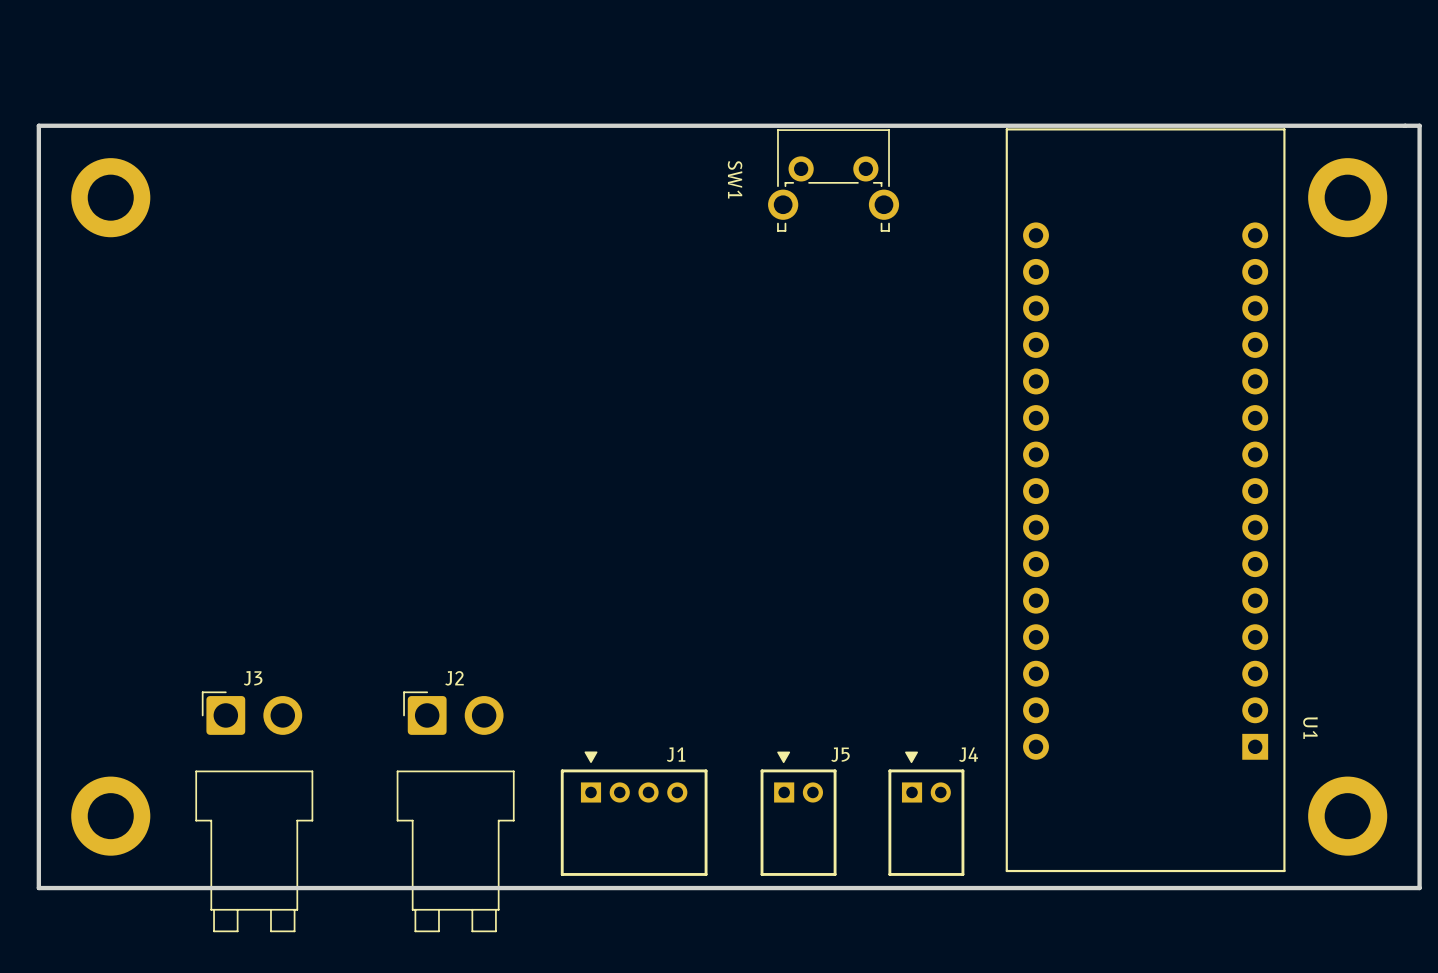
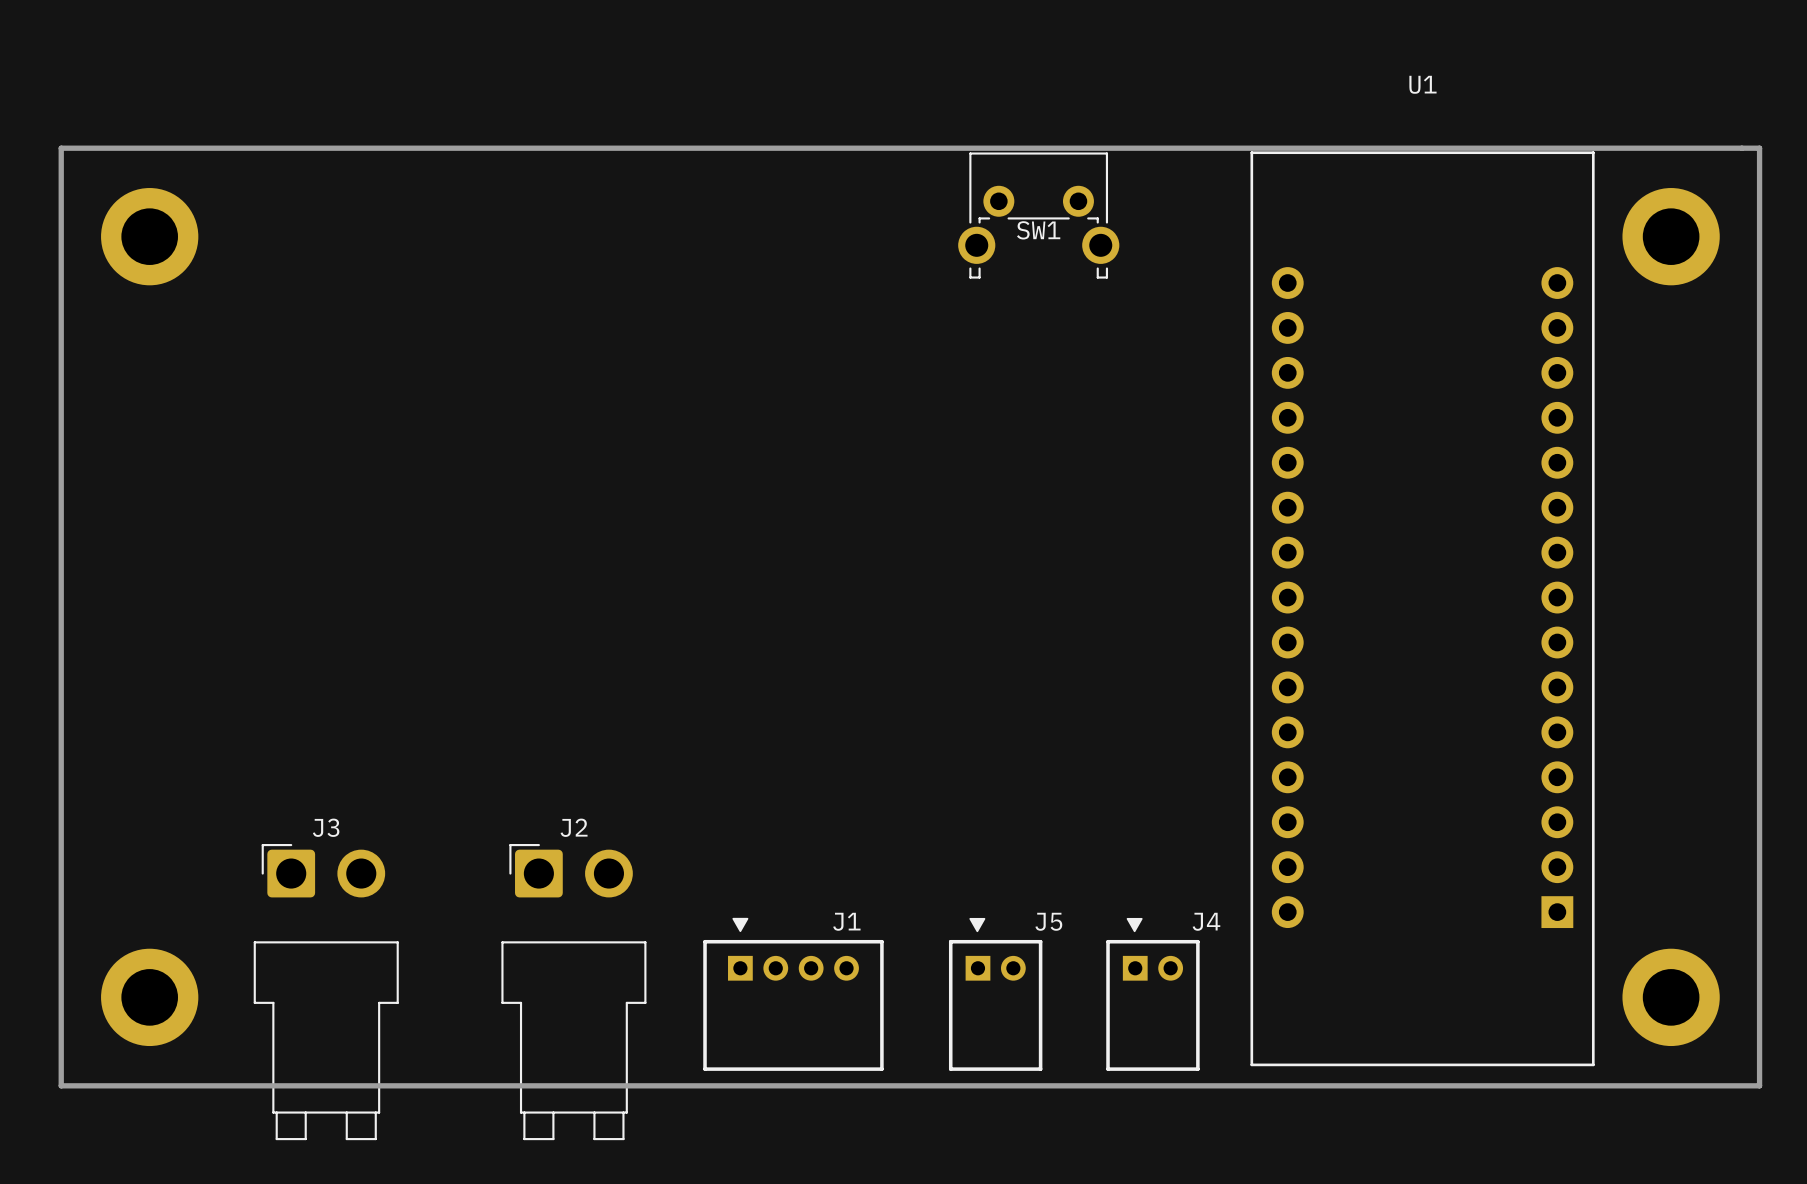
SW1 name rotation: 0° (735, 179) -> 90° counterclockwise (1038, 230)
SW1 name position: SW1 (735, 179) -> SW1 (1038, 230)
U1 name rotation: 0° (1310, 728) -> 90° counterclockwise (1422, 84)
U1 name position: U1 (1310, 728) -> U1 (1422, 84)

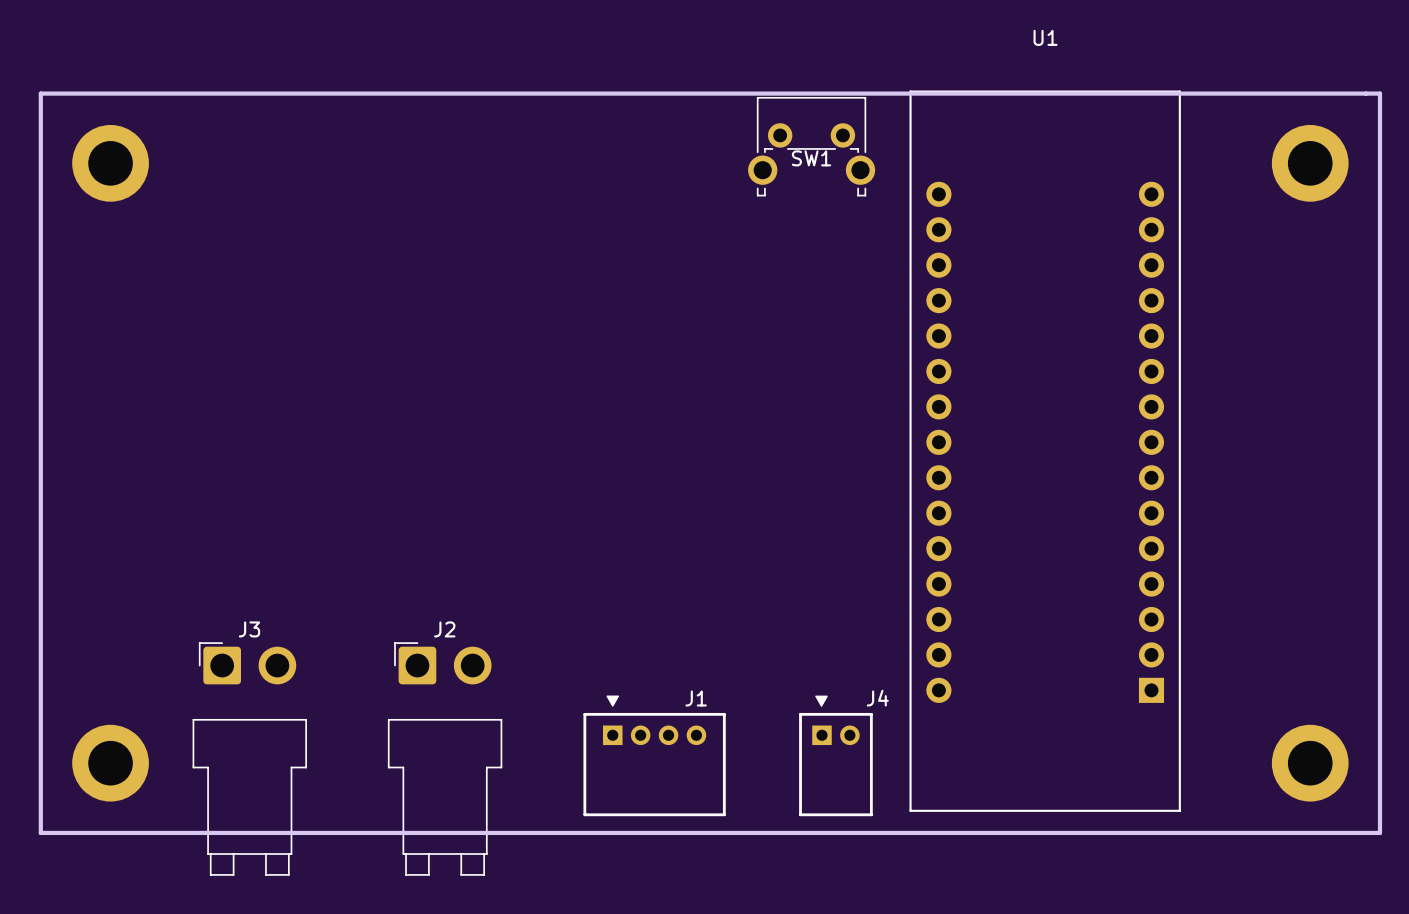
U1 position: (1422, 608) -> (1045, 451)
J1 position: (793, 994) -> (654, 755)
J5: (995, 994) -> none
J4 position: (1152, 994) -> (835, 755)

